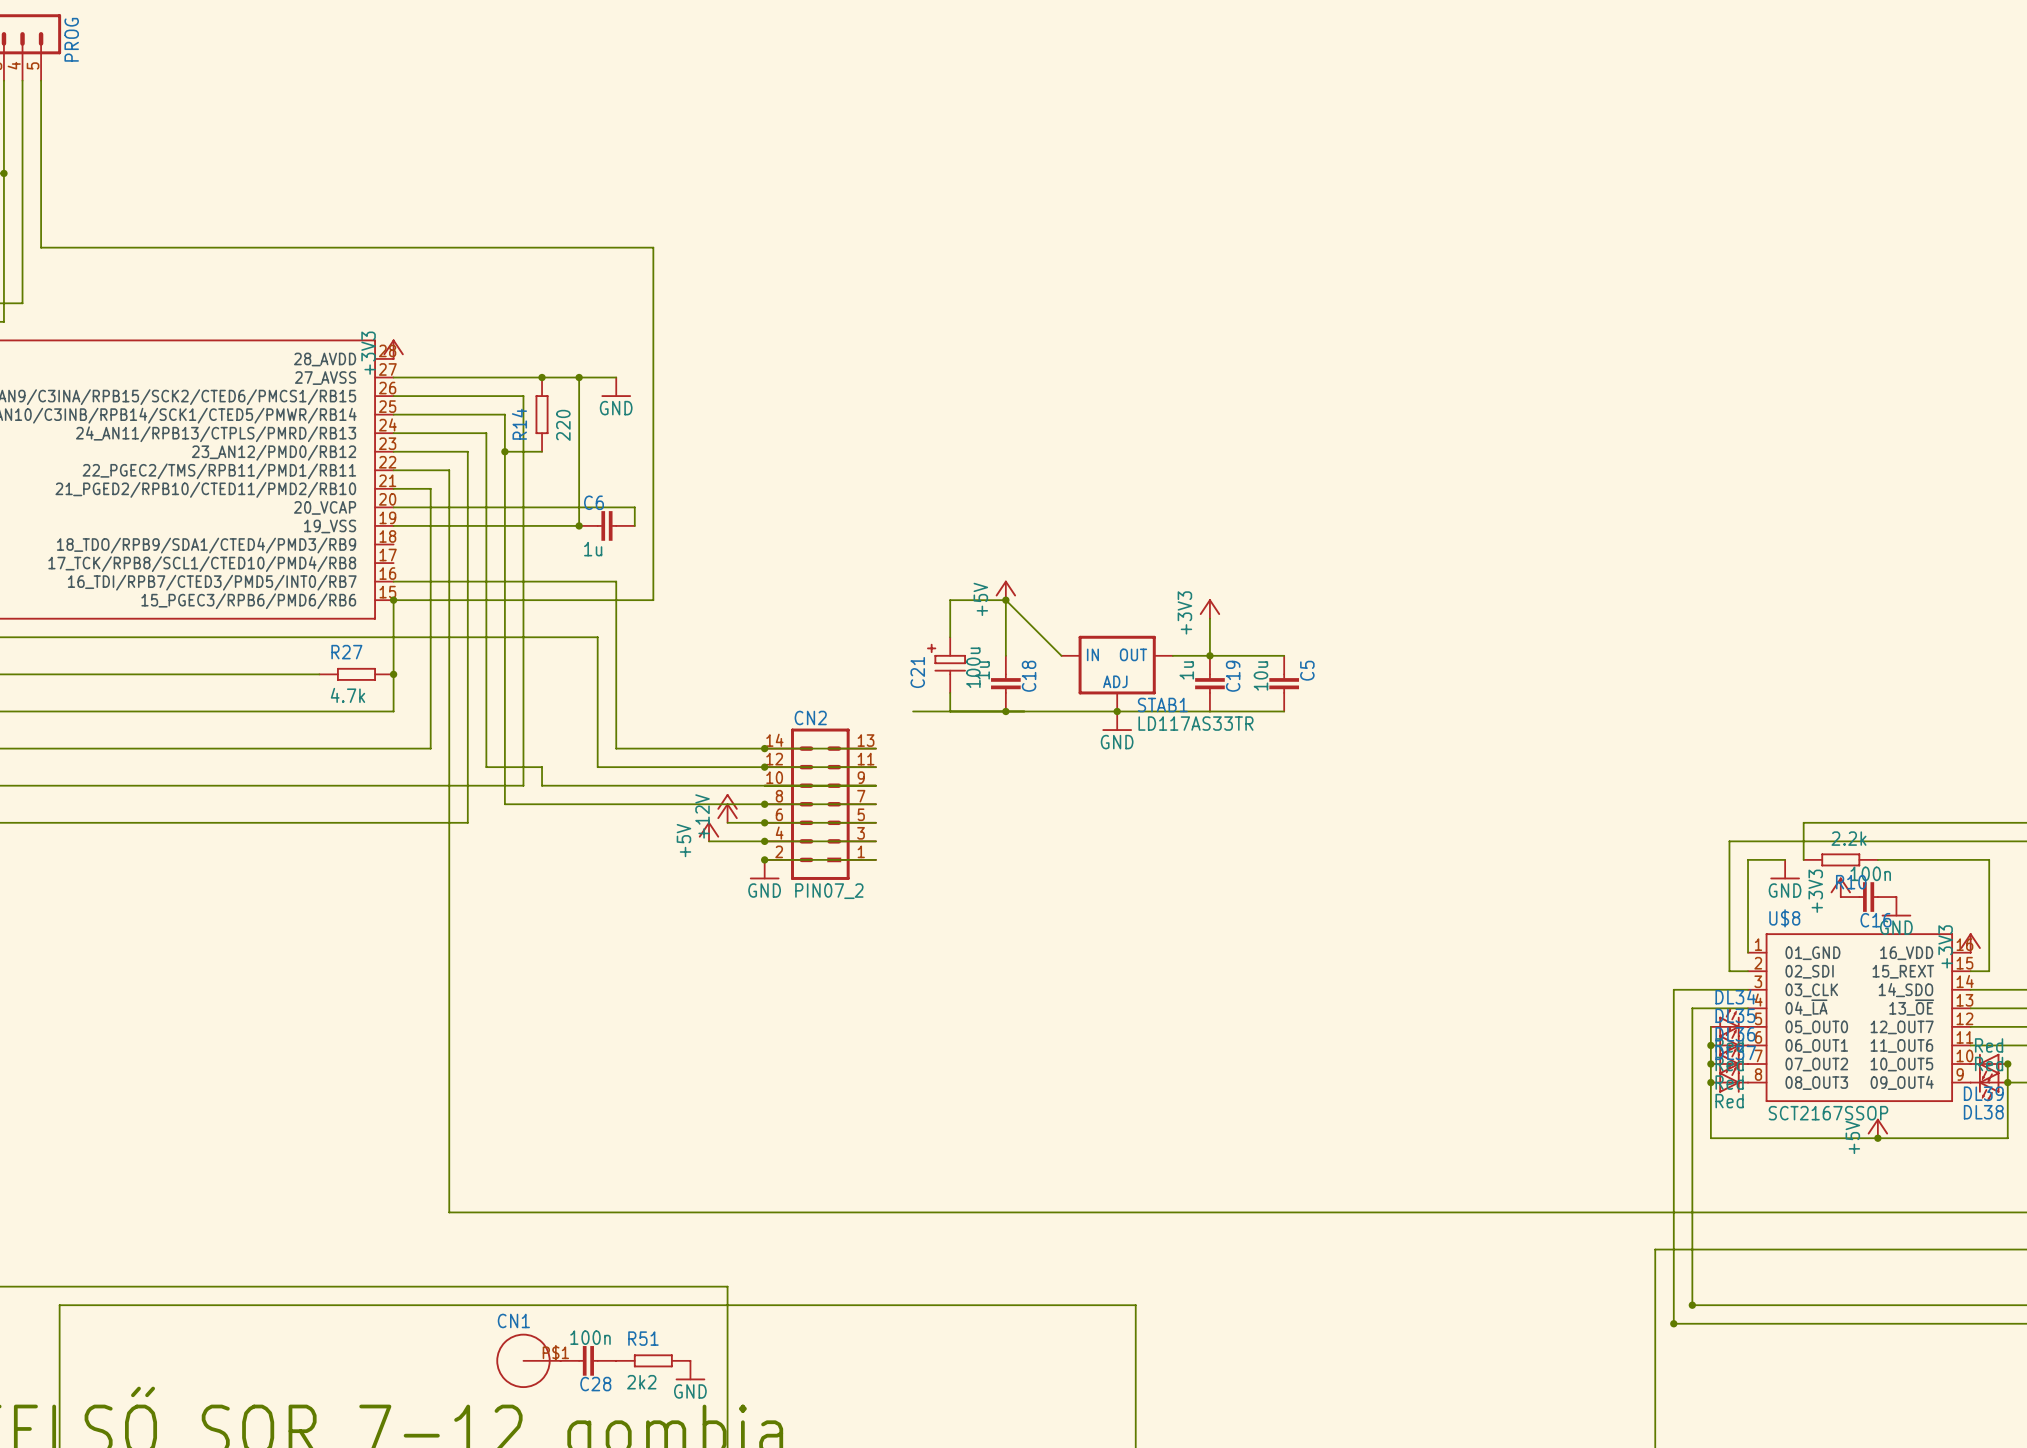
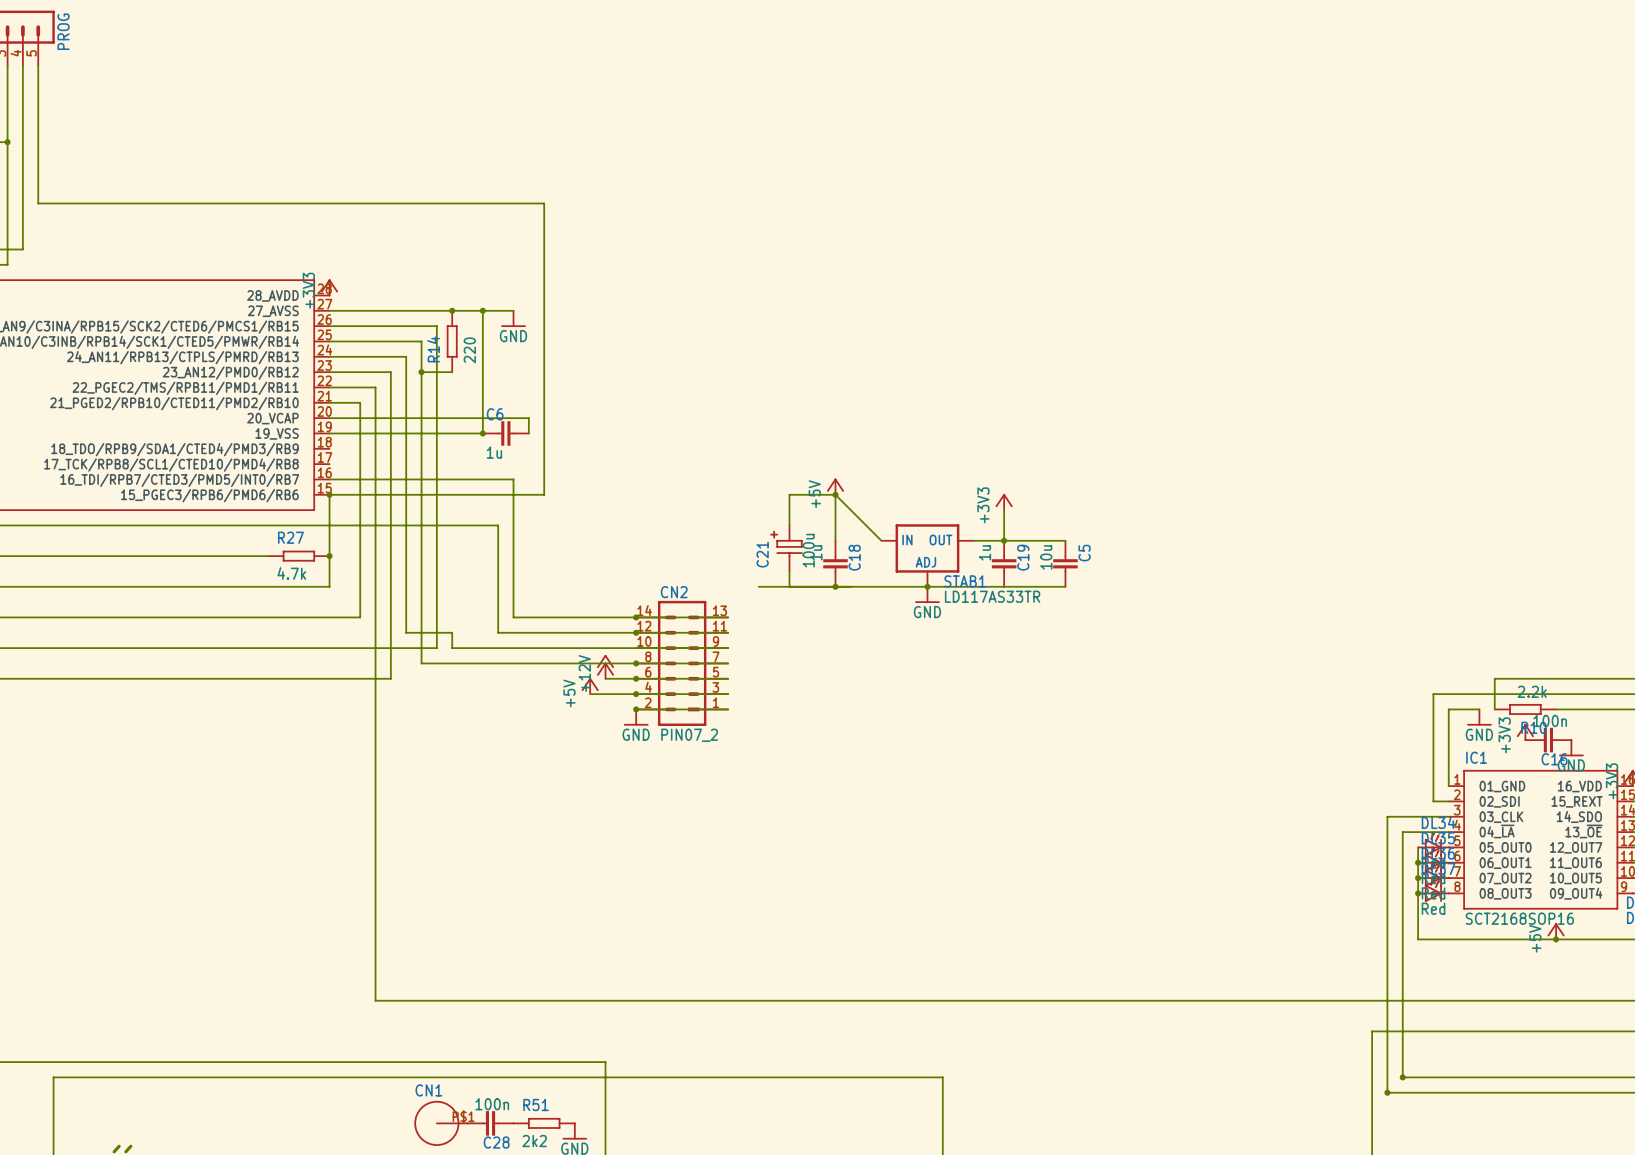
U$8 name: U$8 (1784, 918) -> IC1 (1476, 757)
U$8 value: SCT2167SSOP (1828, 1113) -> SCT2168SOP16 (1519, 918)

